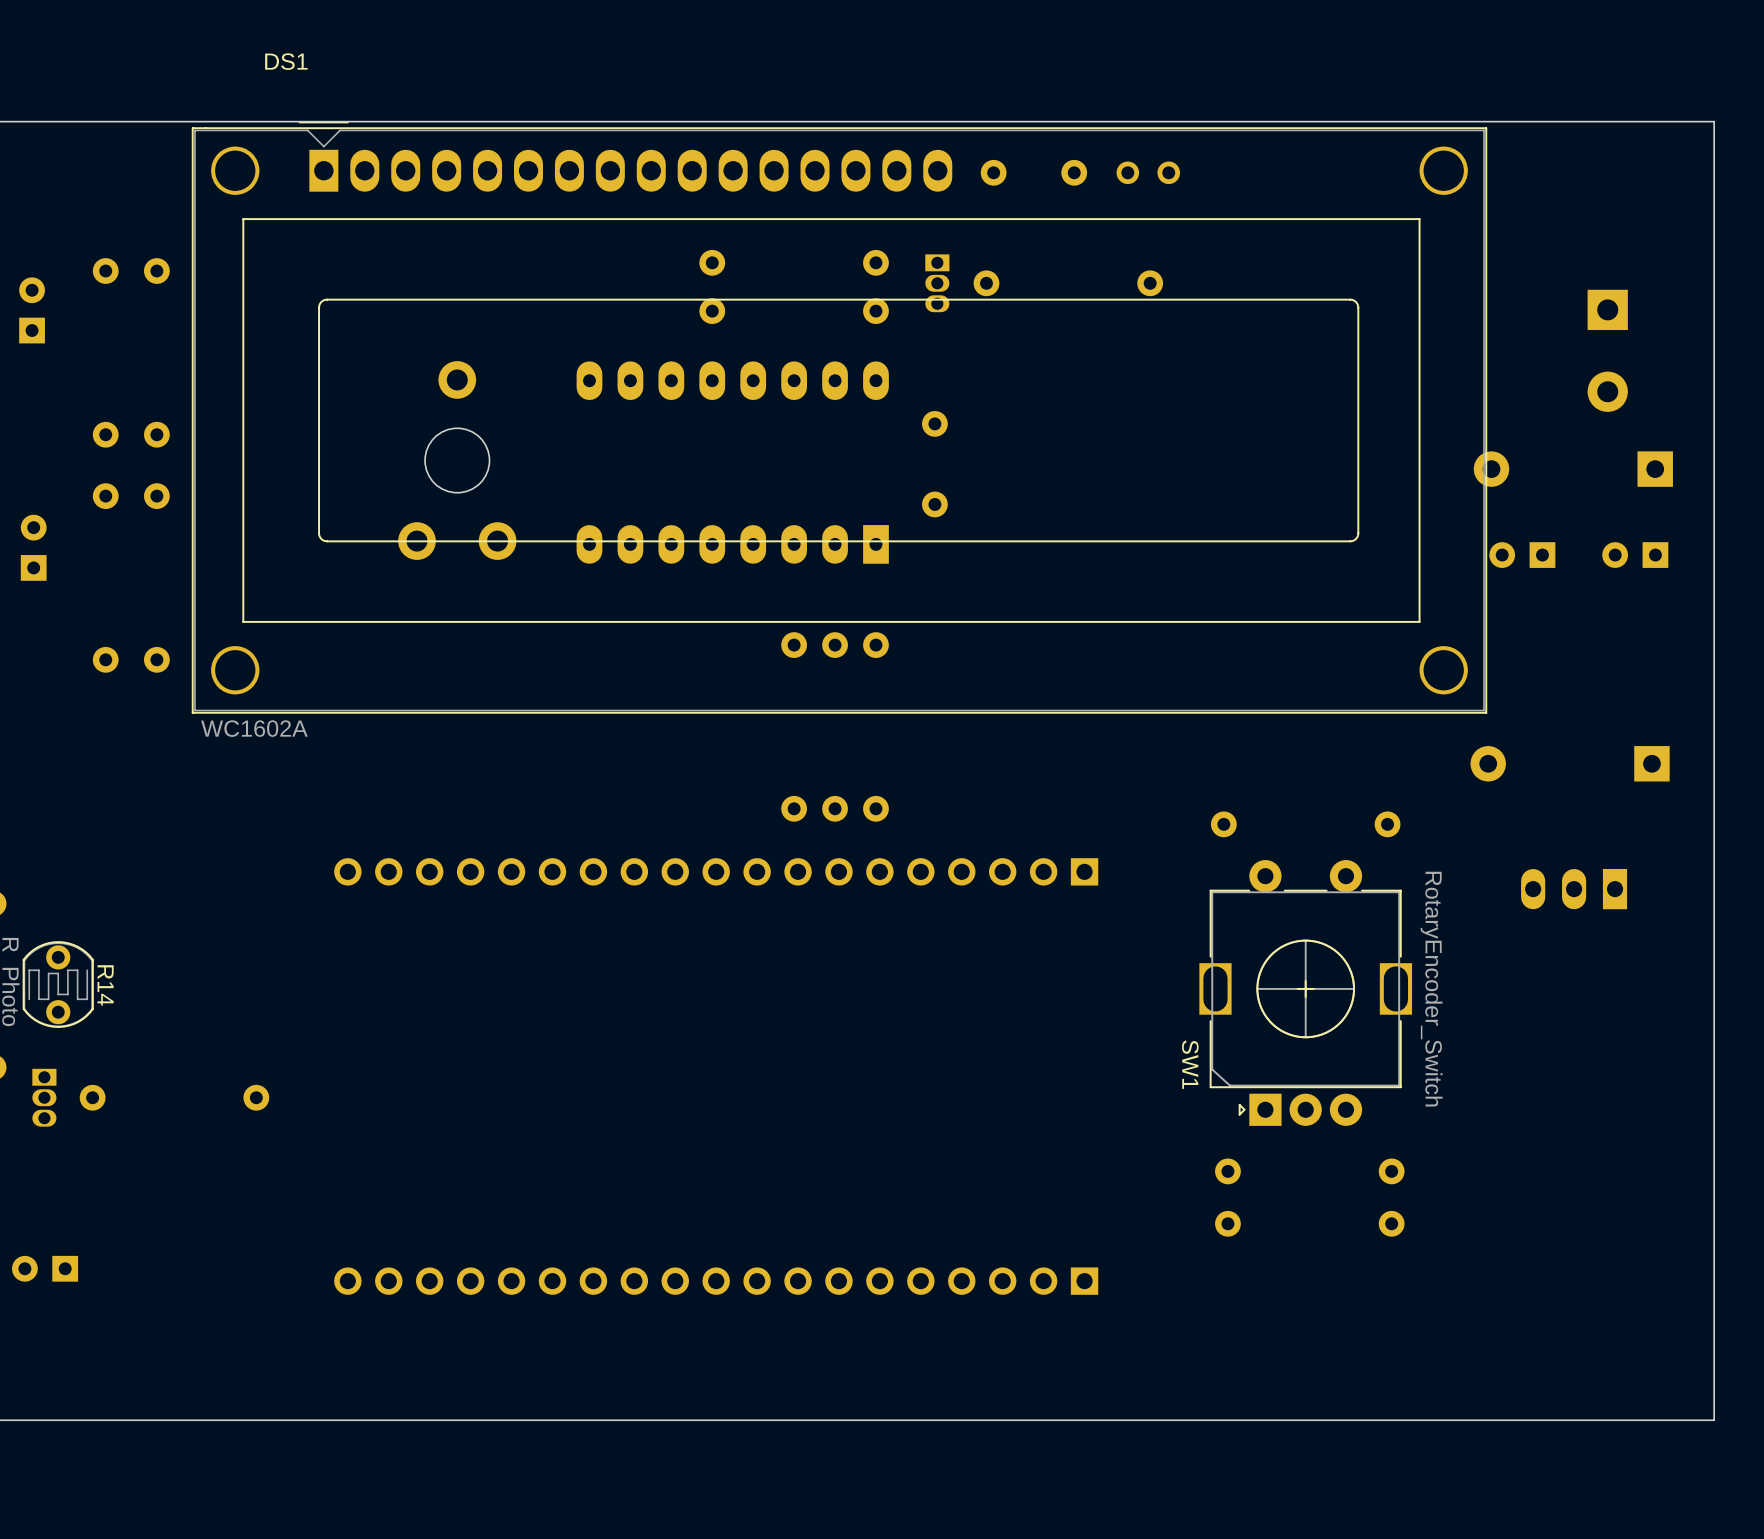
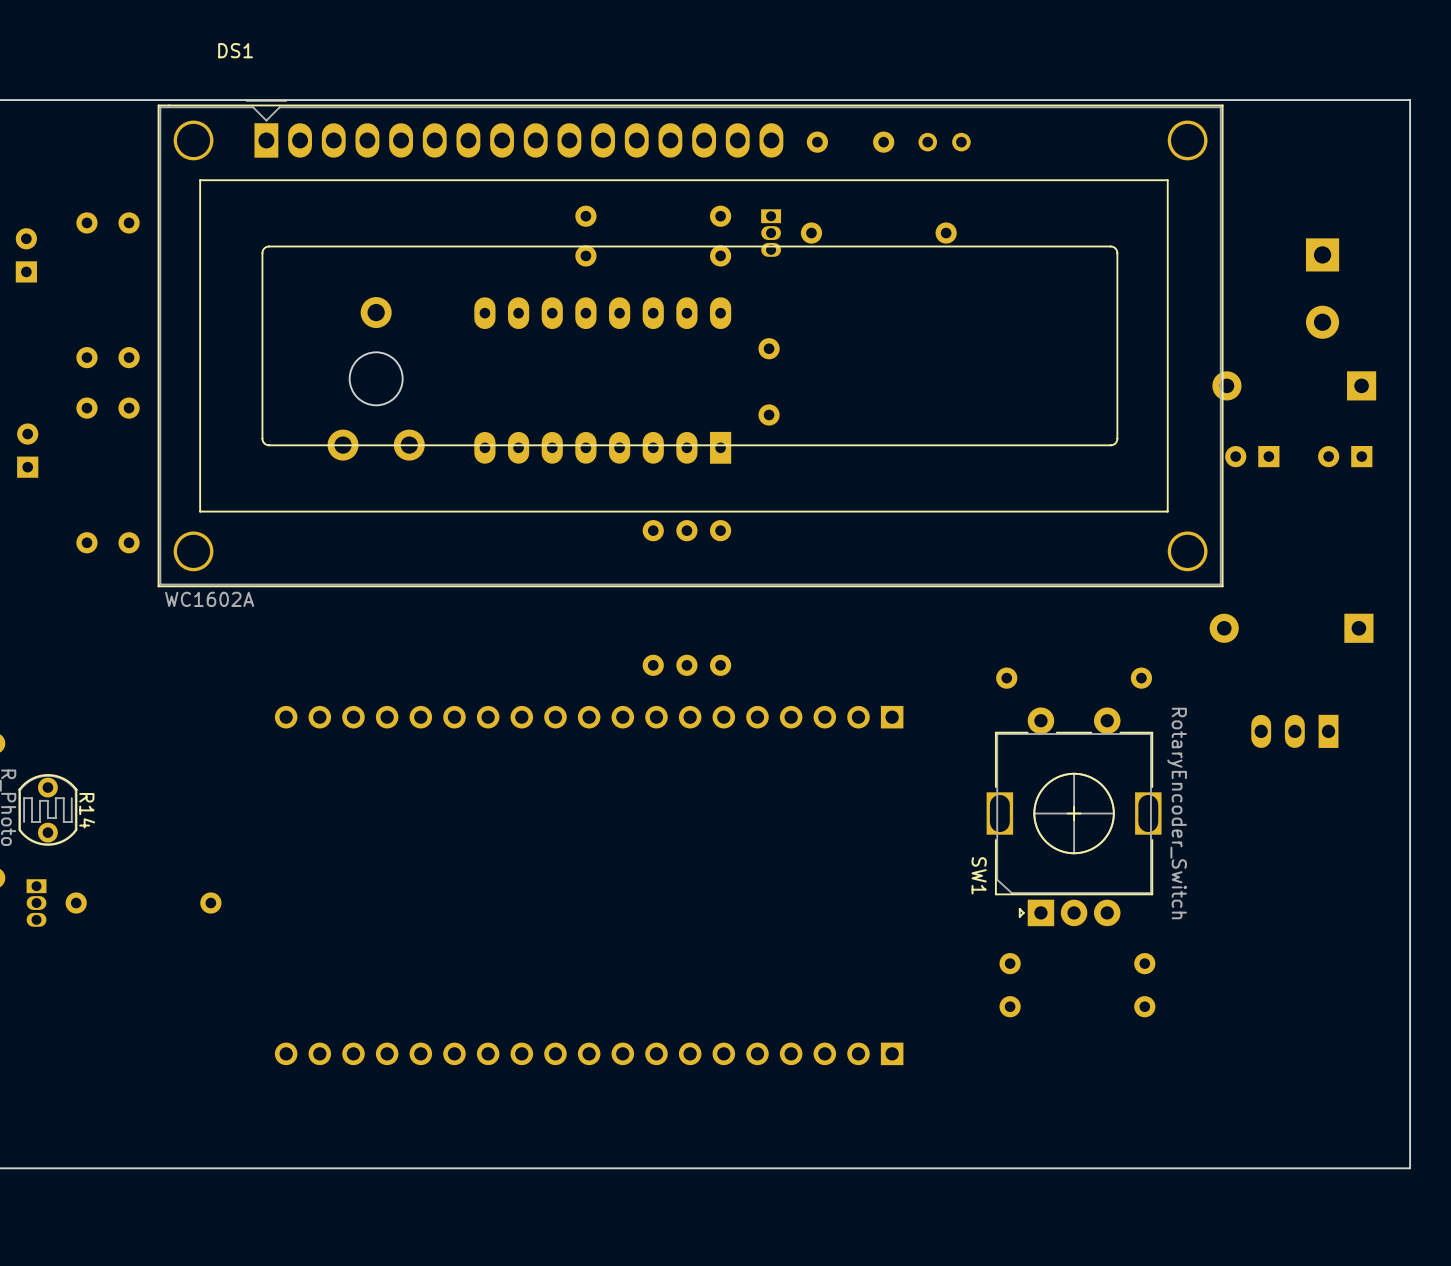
part: (45, 1268) -> none

